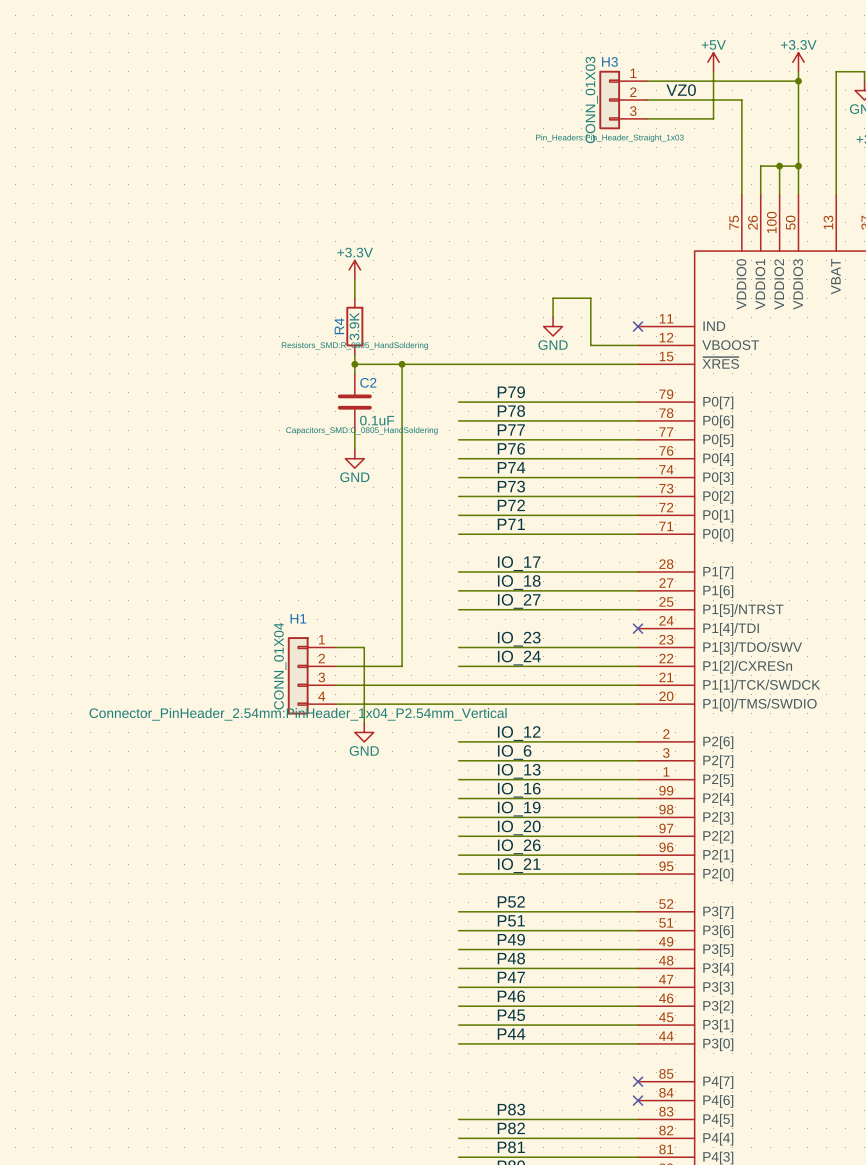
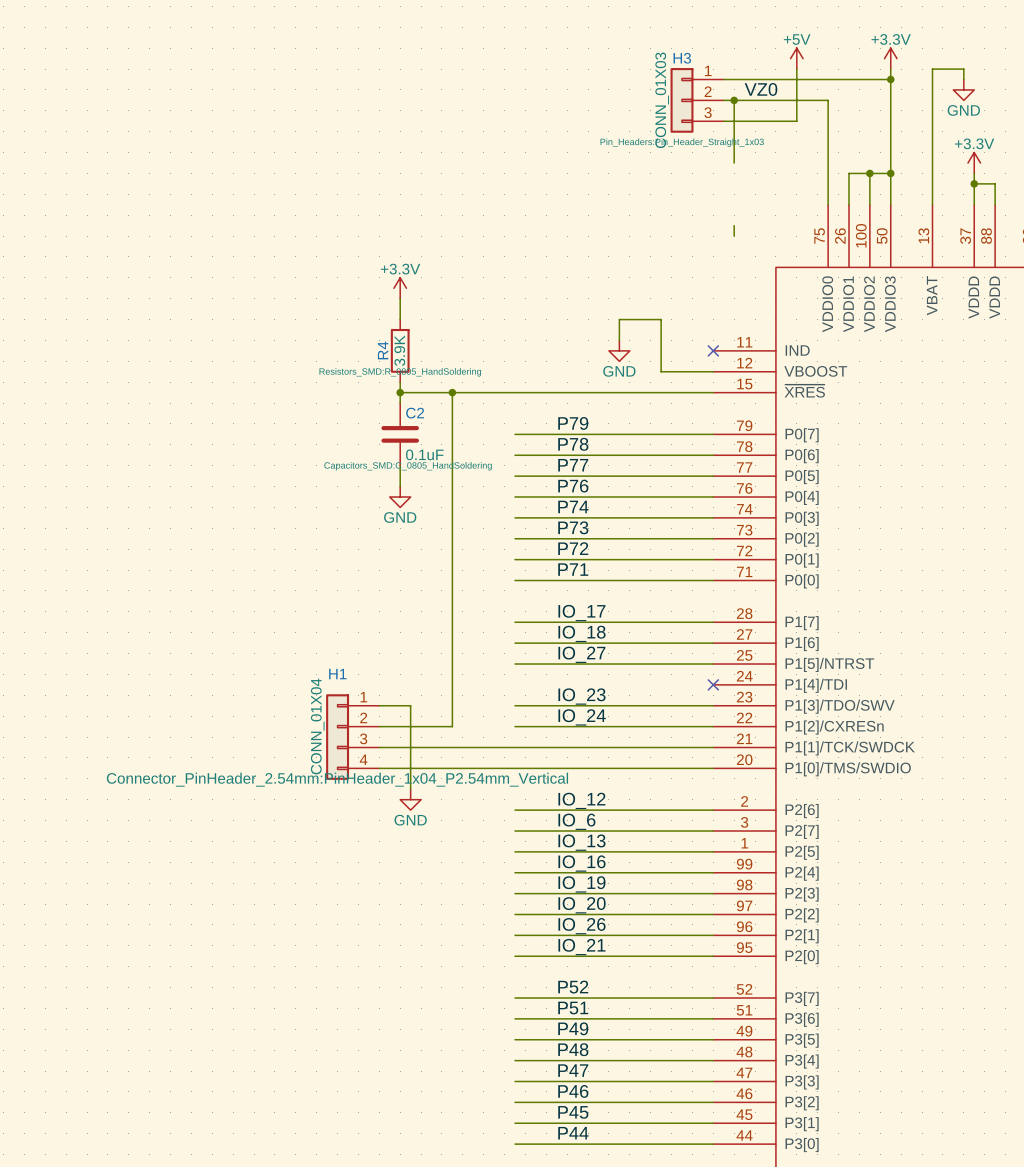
wire: none -> (734, 100) (734, 163)
junction: none -> (734, 100)
wire: none -> (734, 225) (734, 236)

